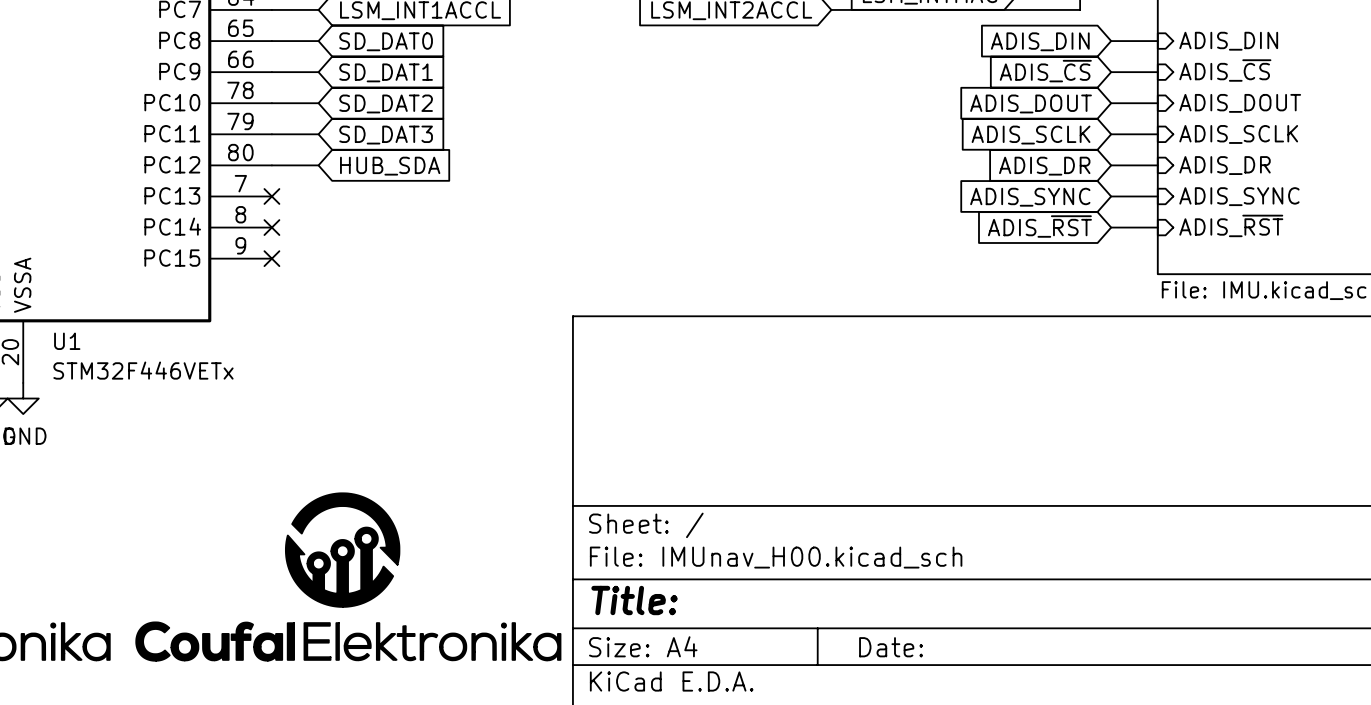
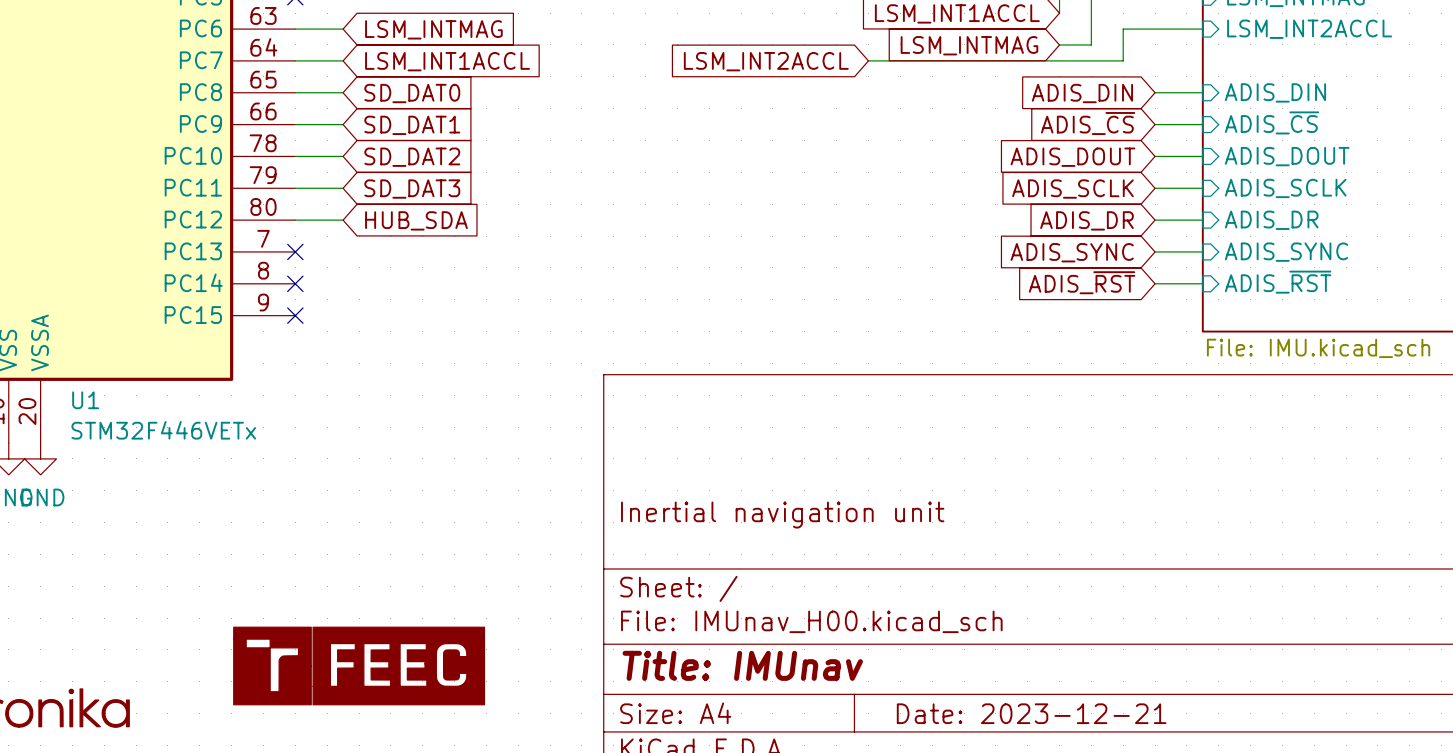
title block: none -> Inertial navigation unit (782, 515)
part: (348, 577) -> none
part: none -> (359, 665)
title block: Title: (634, 600) -> Title: IMUnav (742, 665)
title block: Date: (891, 647) -> Date: 2023-12-21 (1031, 713)

